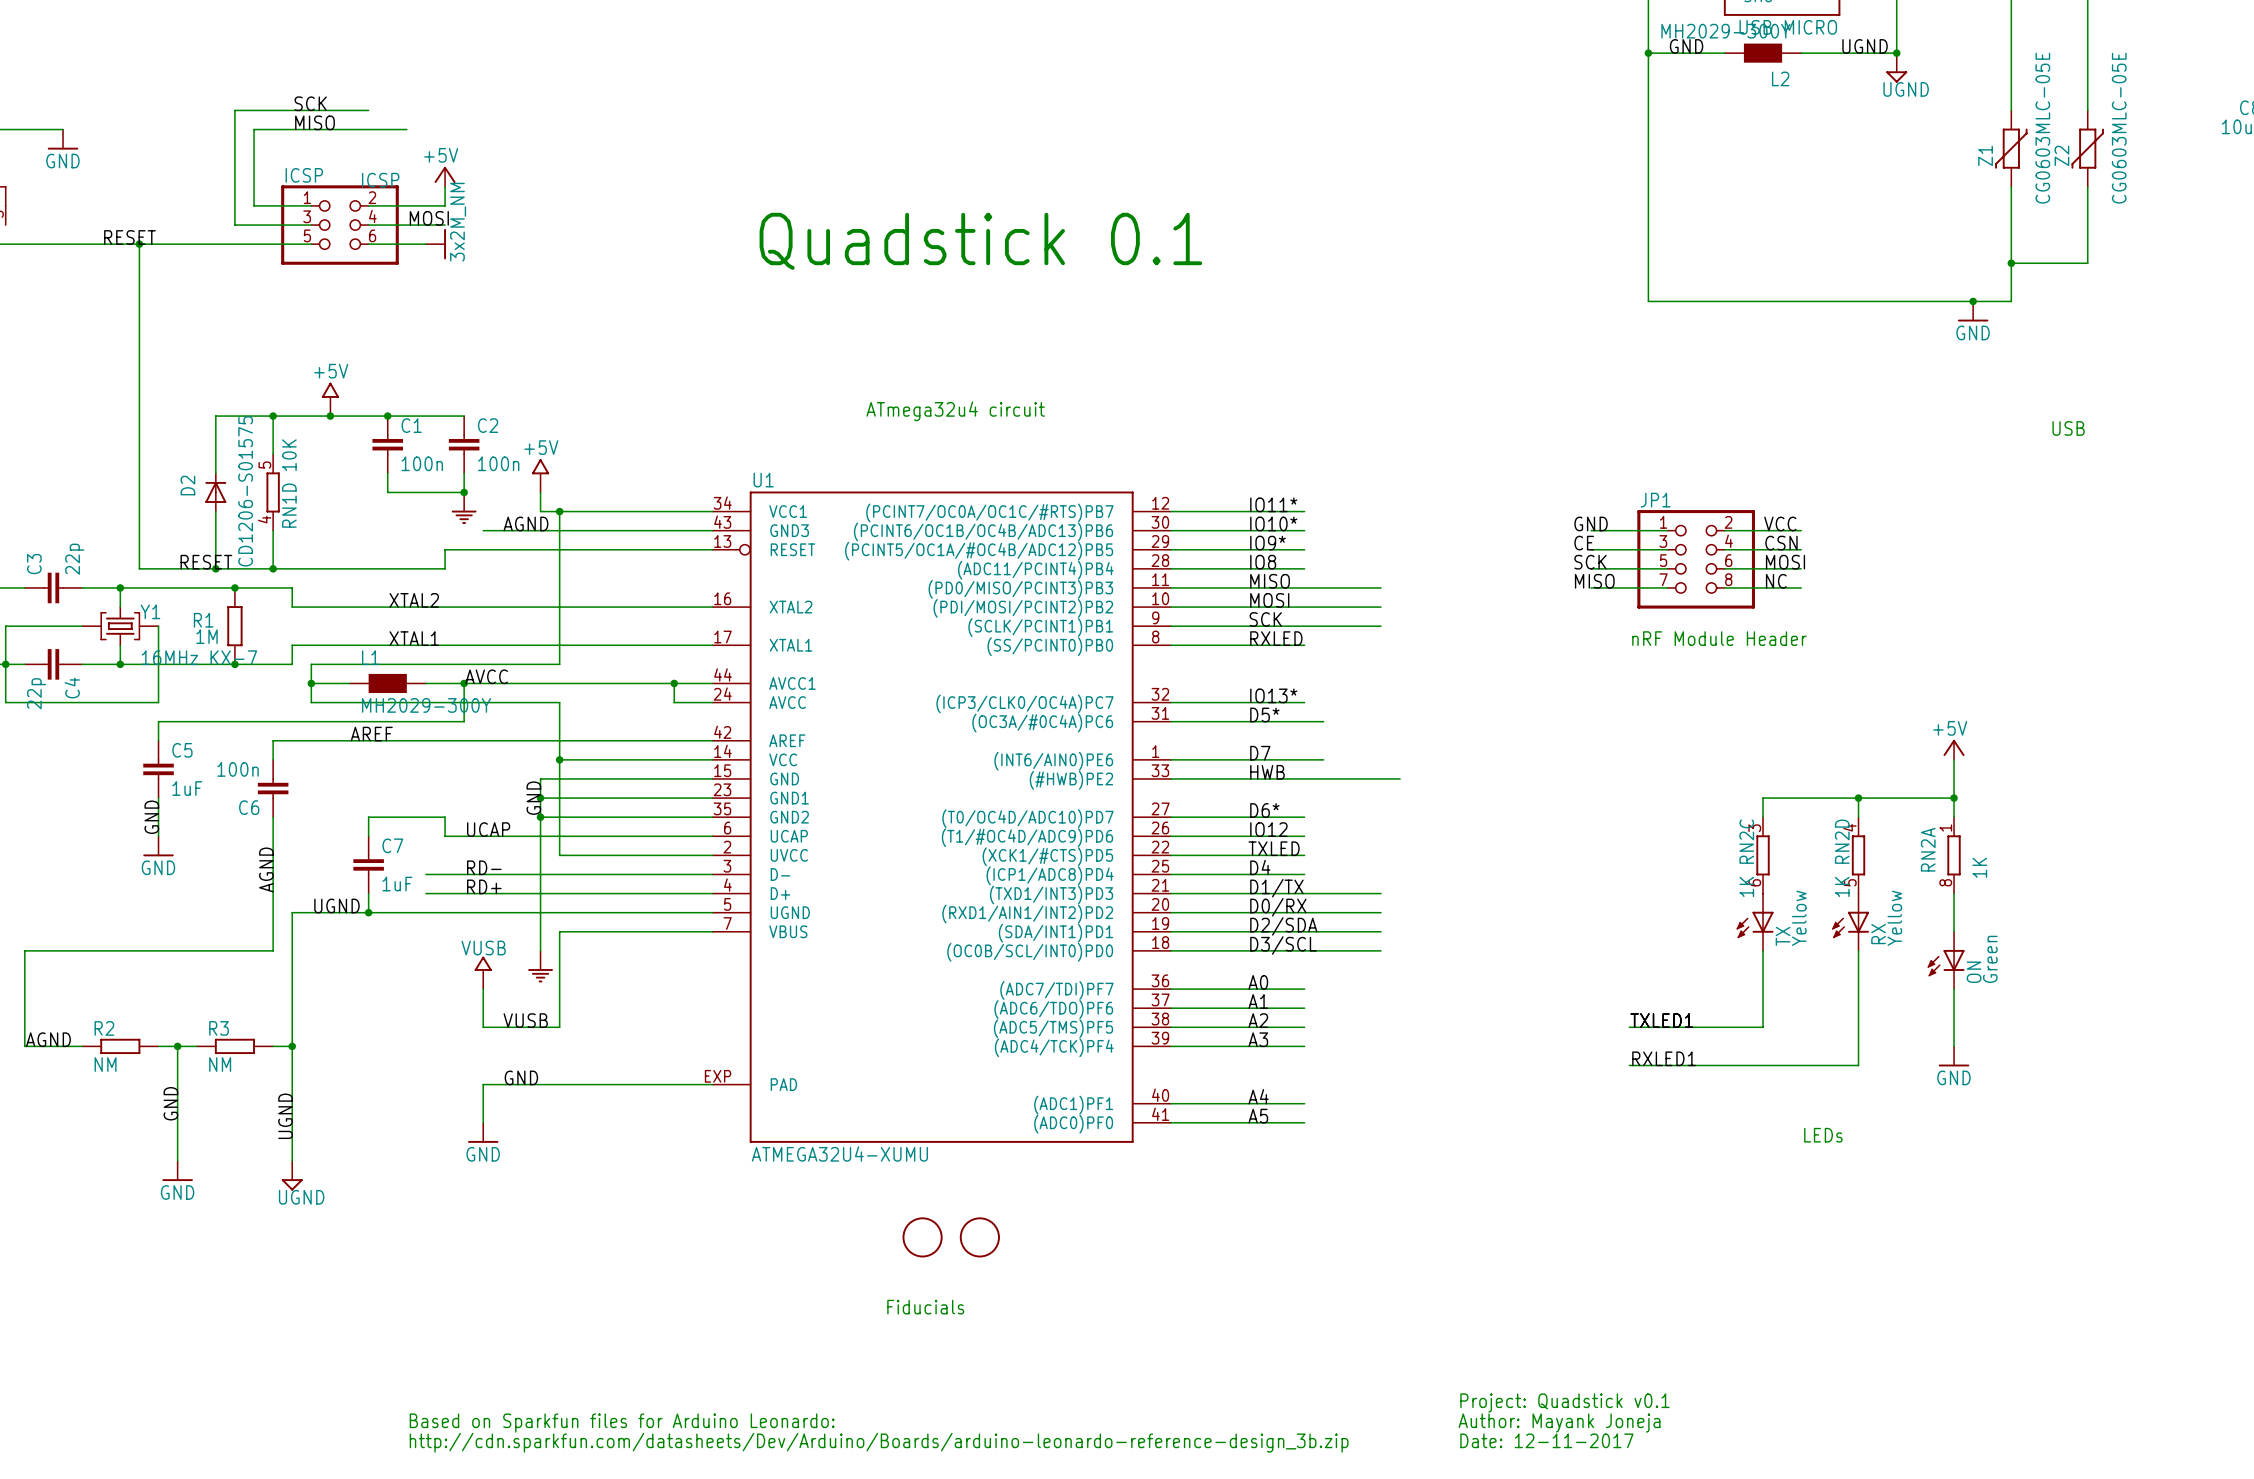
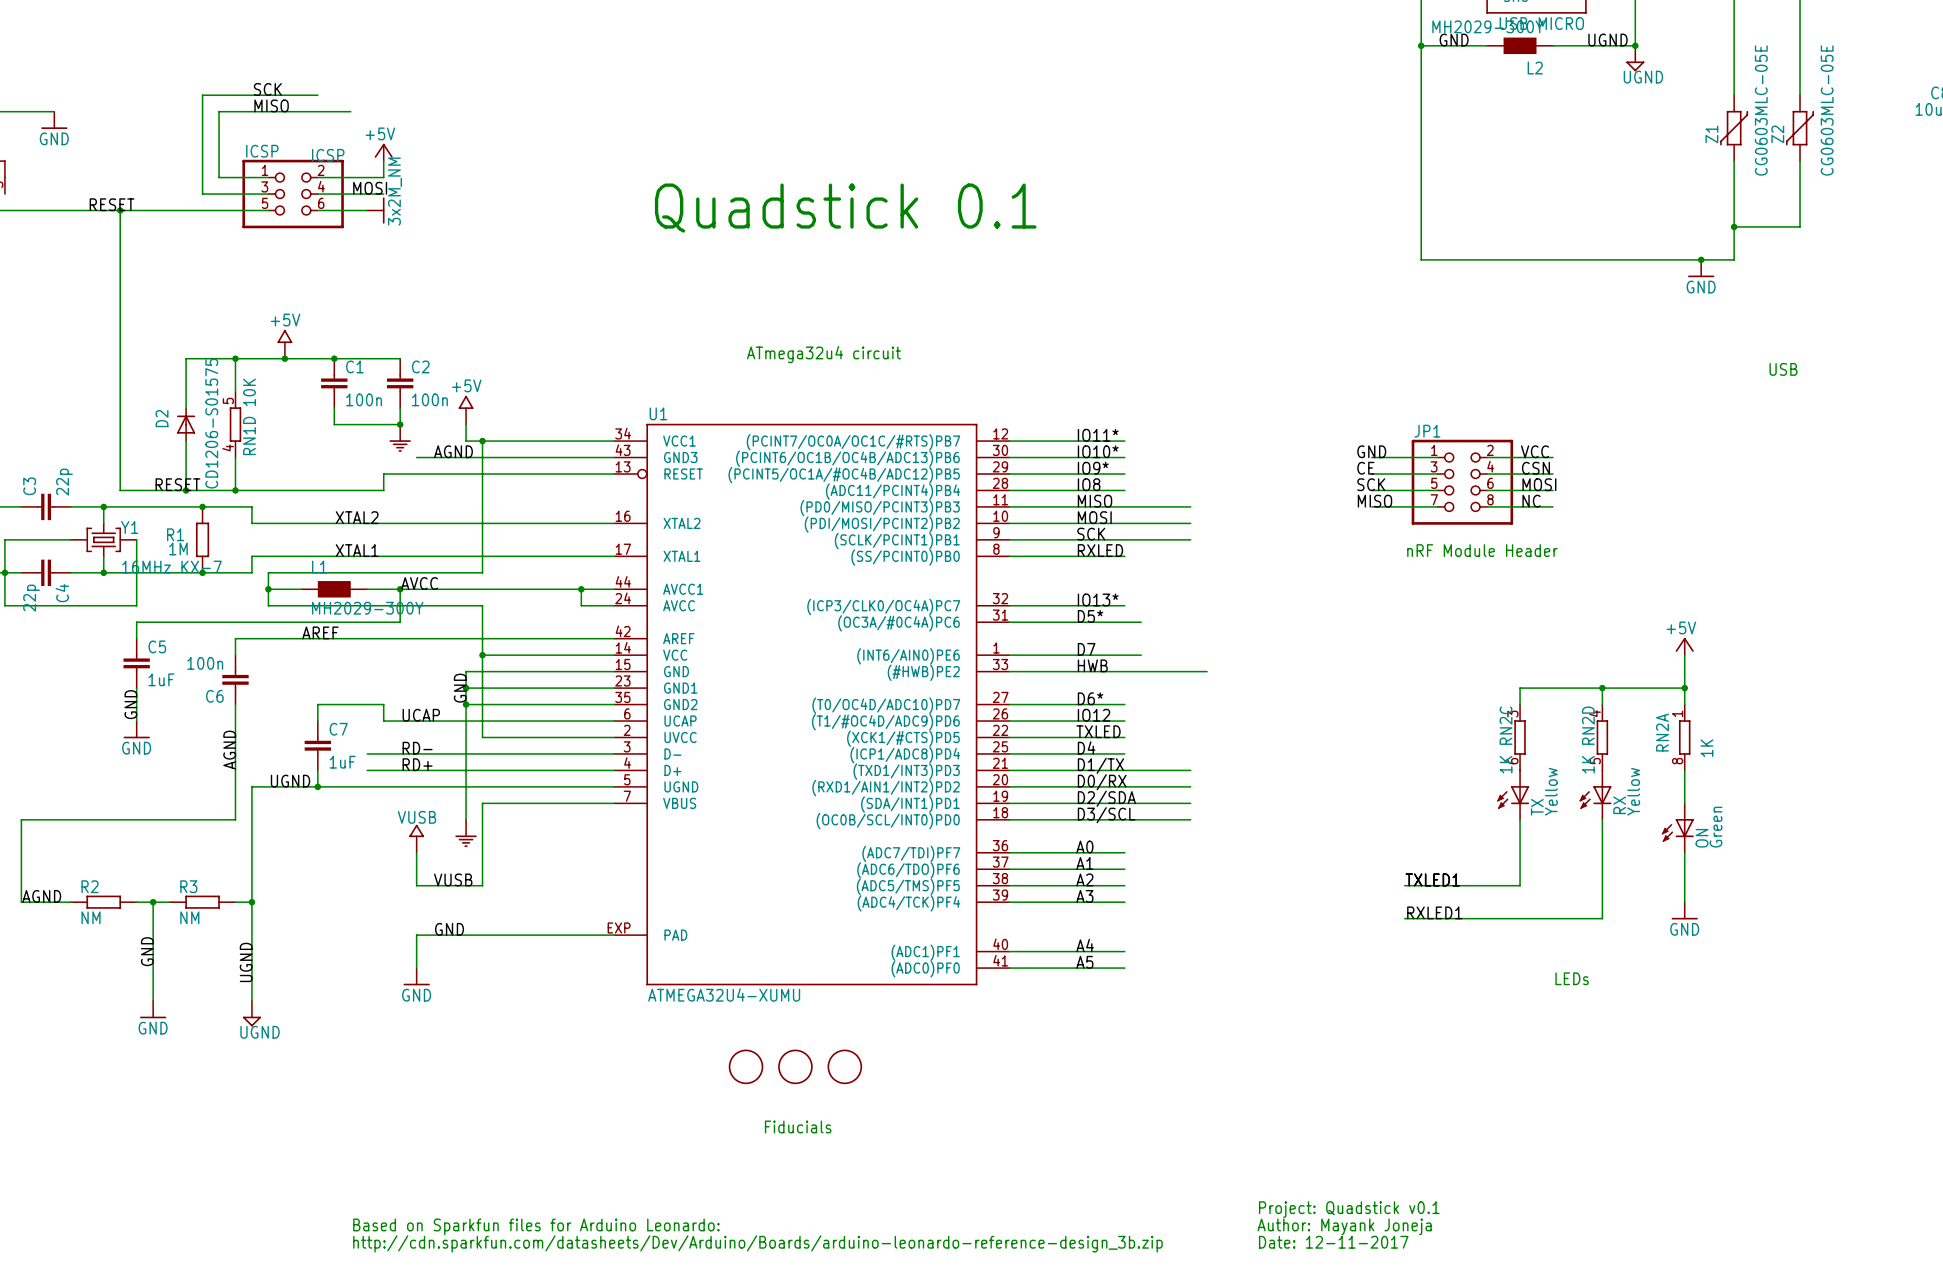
part: none -> (746, 1066)

